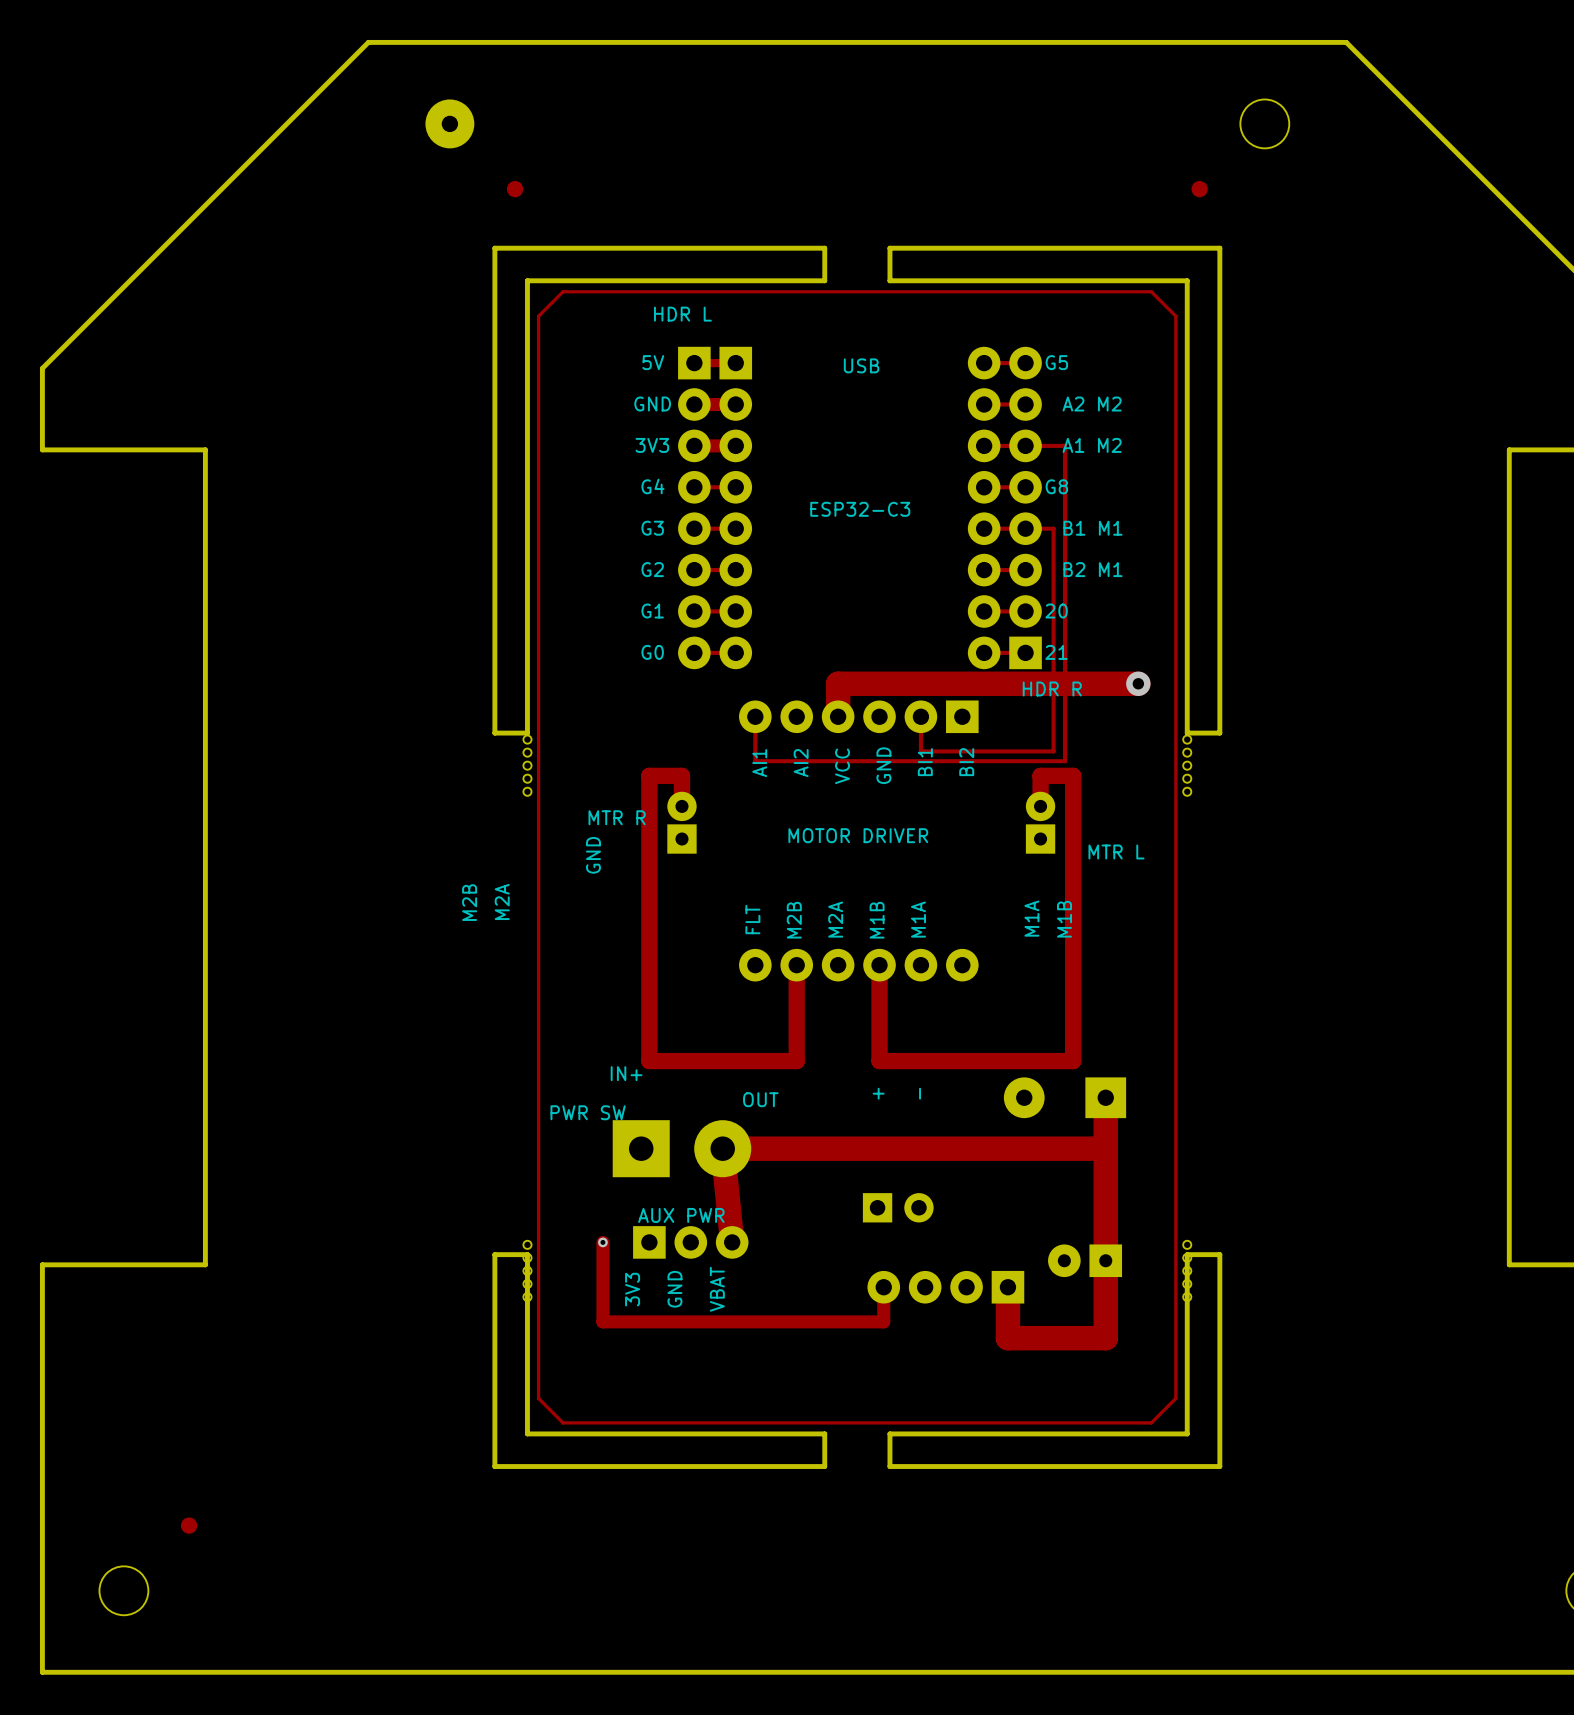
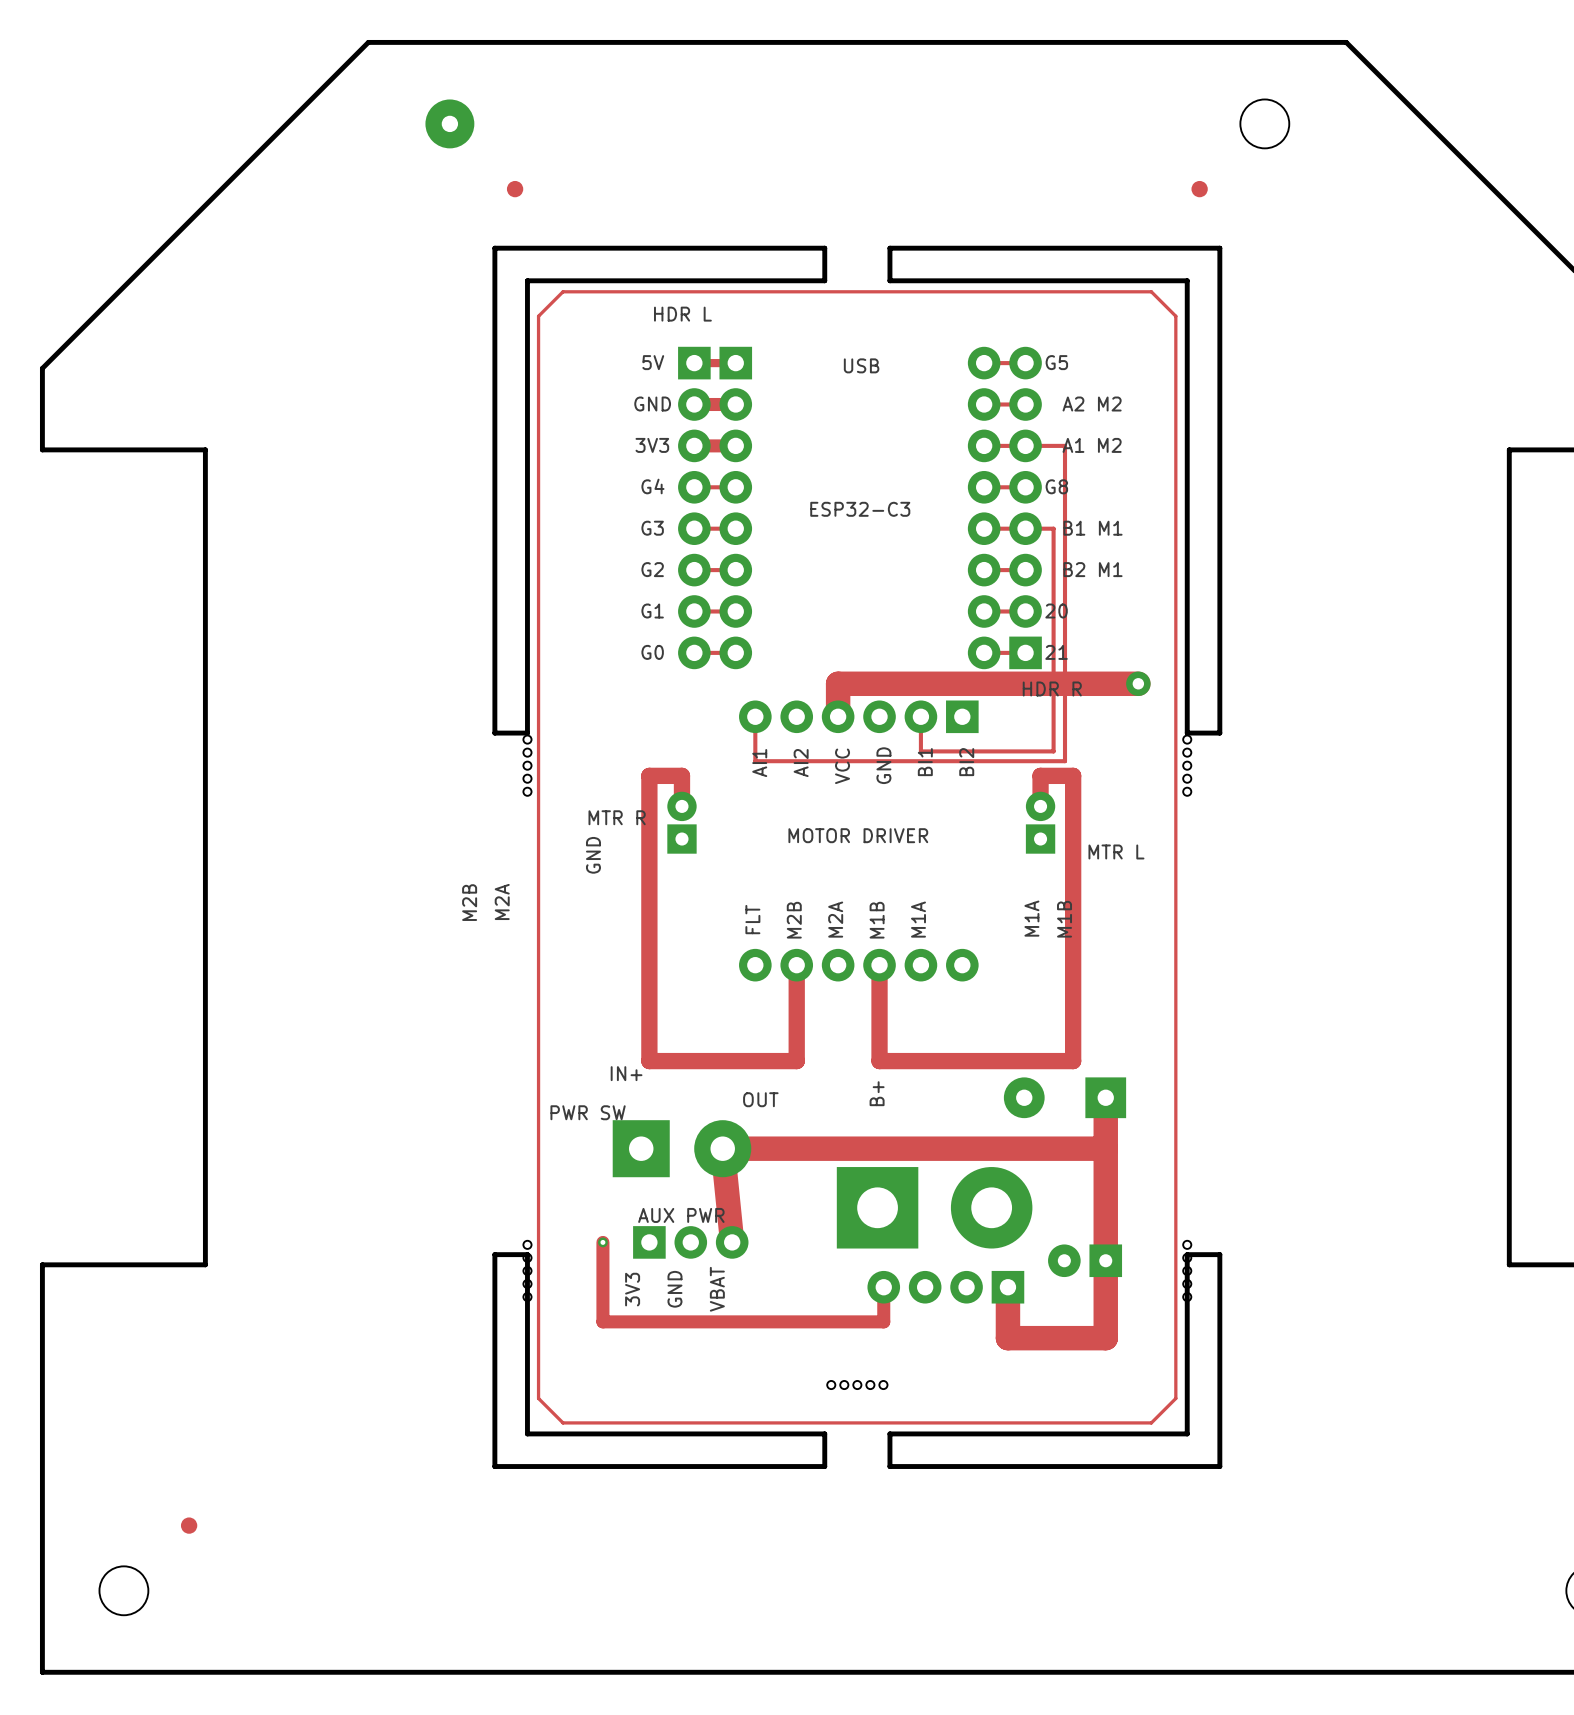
text: + (878, 1093) -> B+ (877, 1093)
text: - (920, 1093) -> none
part: (898, 1207) -> none
part: none -> (934, 1207)
part: none -> (857, 1385)

